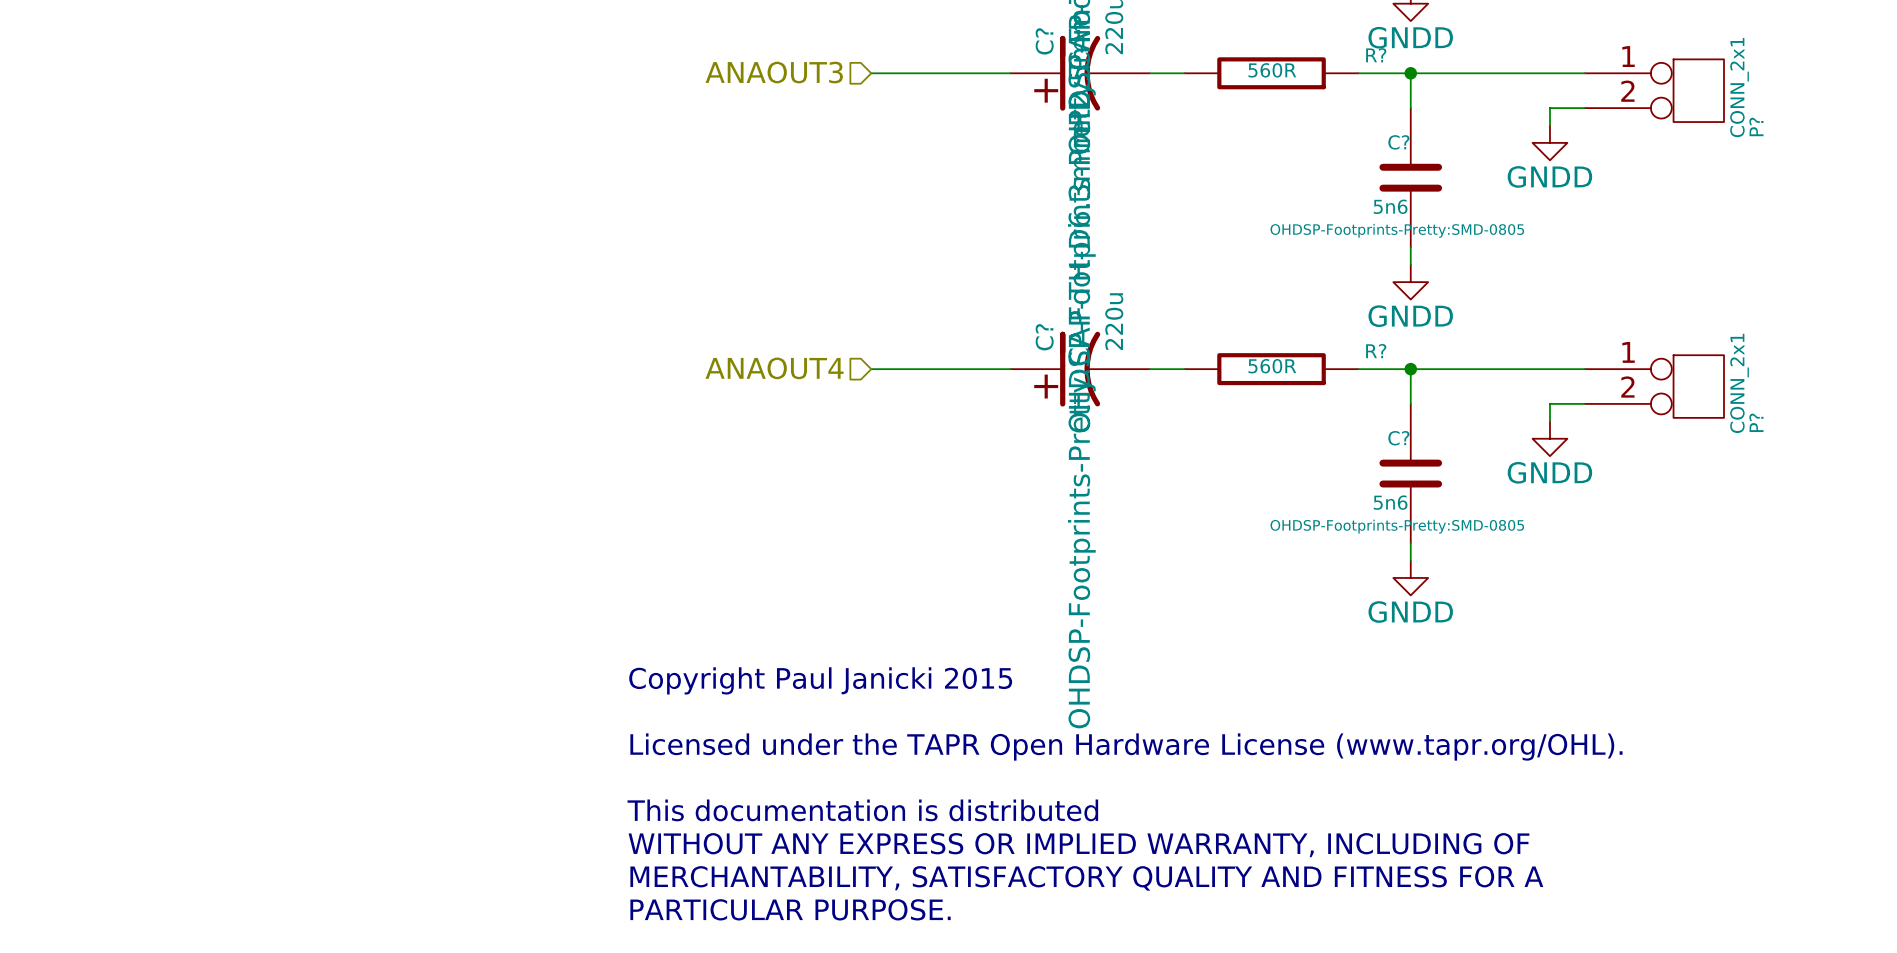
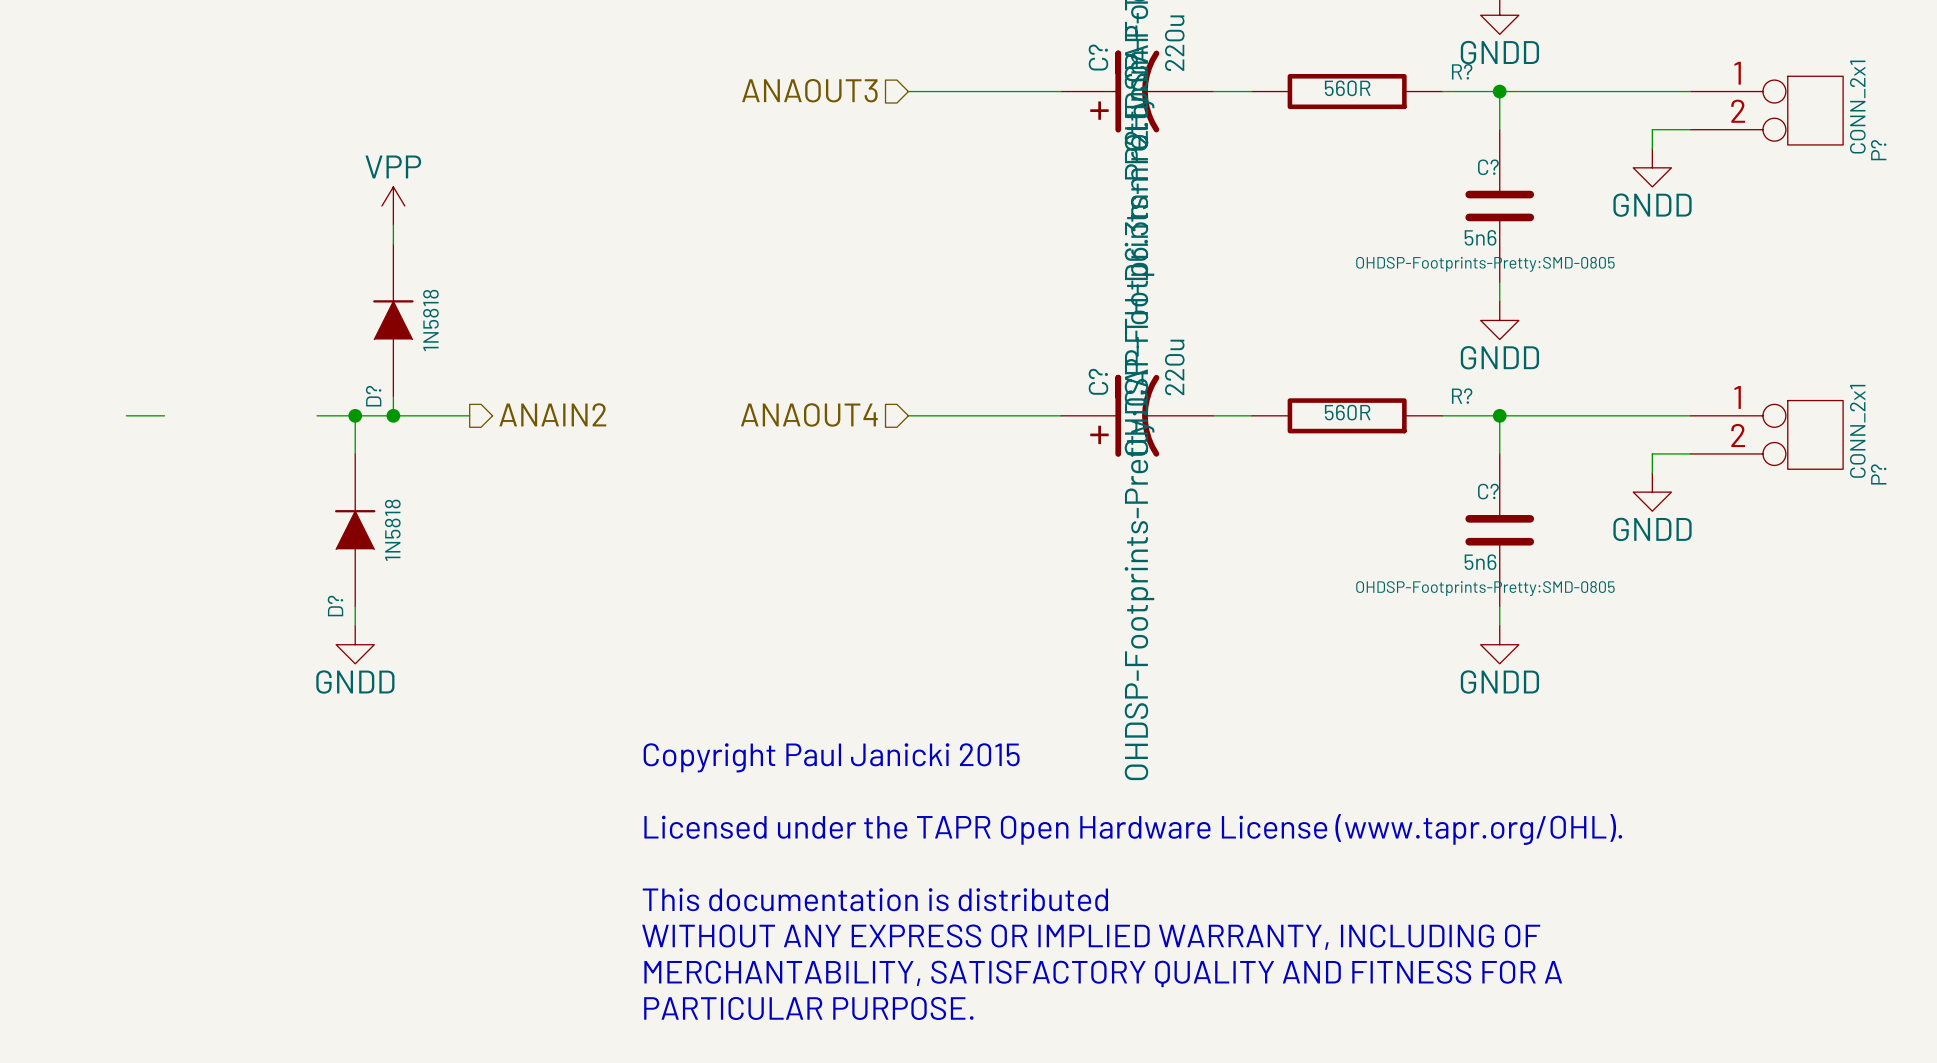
power symbol: none -> VPP (393, 206)
wire: none -> (393, 225) (393, 244)
D?: none -> 1N5818 (393, 320)
wire: none -> (393, 396) (393, 415)
hierarchical label: none -> ANAIN2 (552, 414)
wire: none -> (126, 415) (164, 415)
wire: none -> (317, 415) (469, 415)
wire: none -> (355, 415) (355, 453)
junction: none -> (355, 415)
junction: none -> (393, 415)
D?: none -> 1N5818 (355, 530)
wire: none -> (355, 606) (355, 625)
power symbol: none -> GNDD (355, 644)

